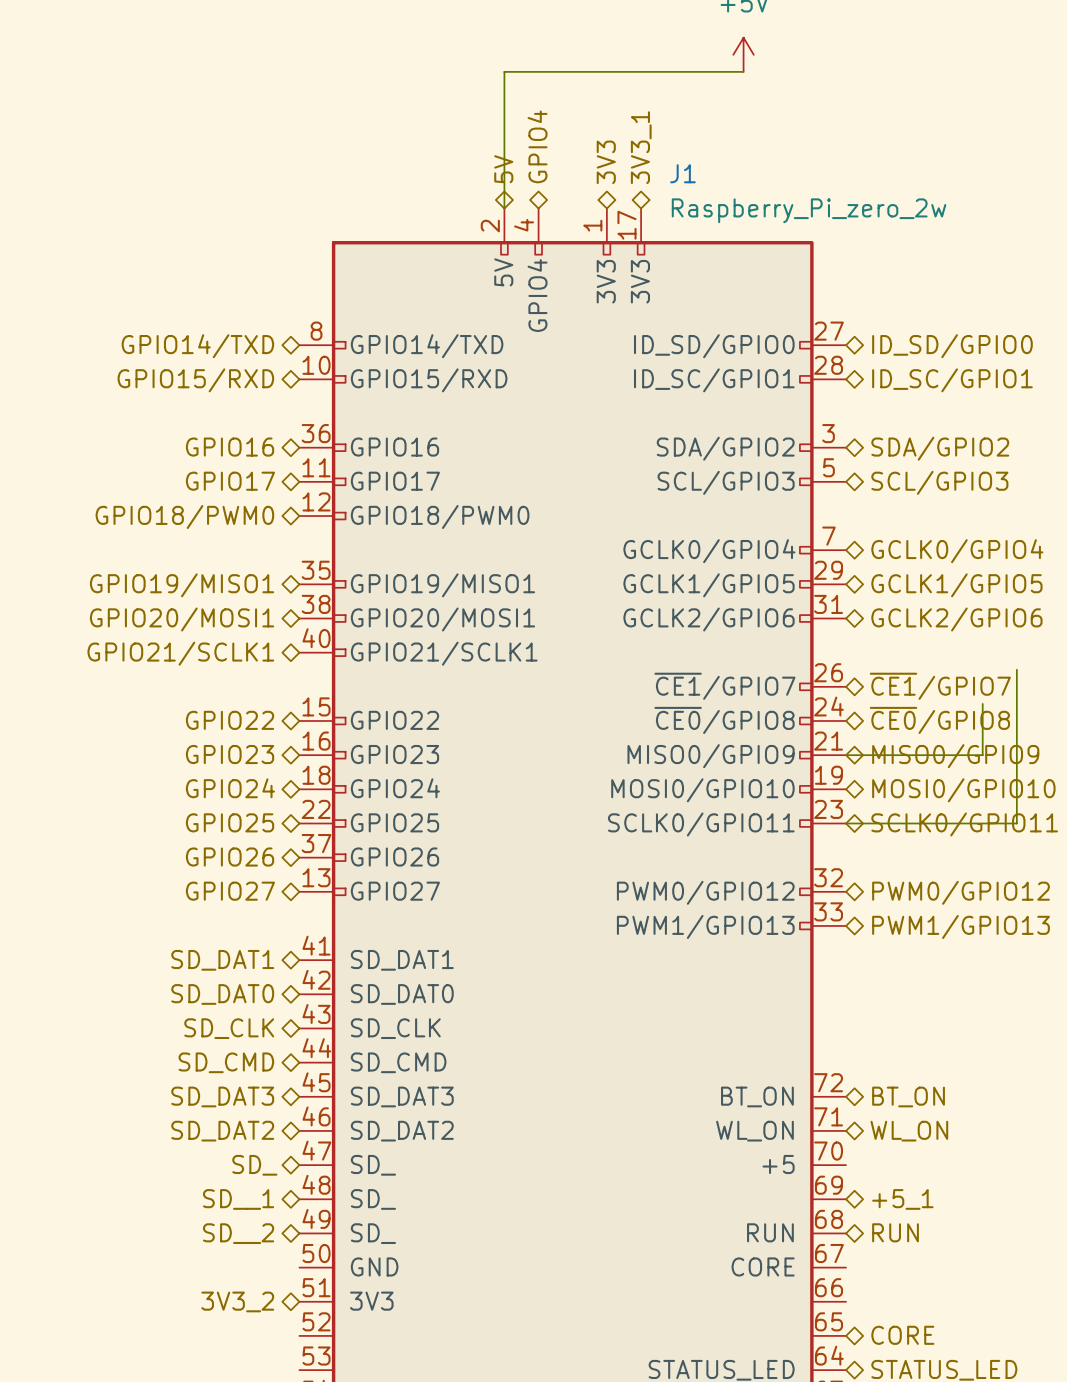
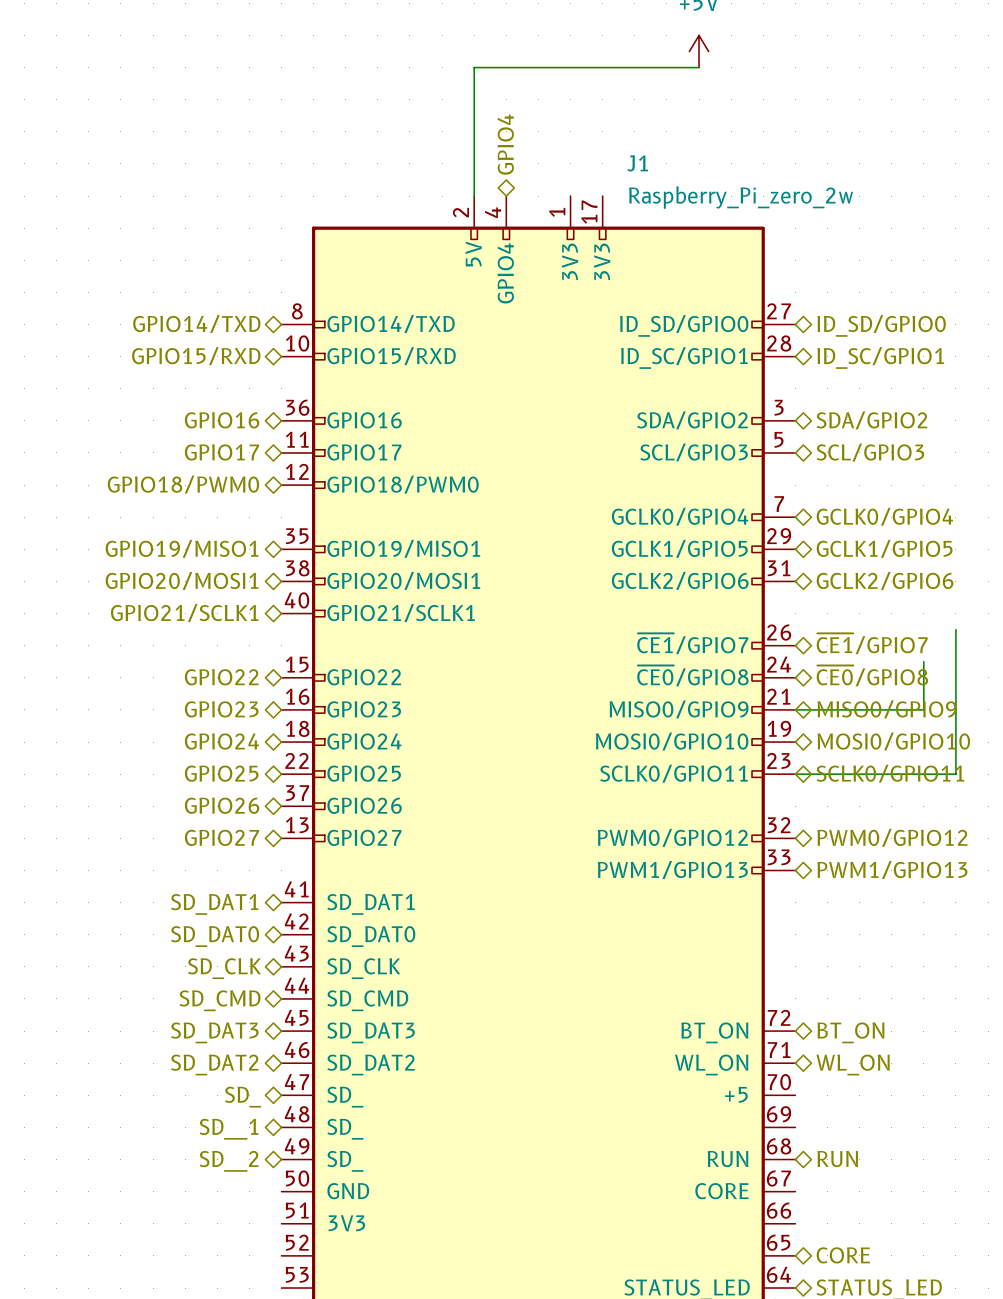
hierarchical label: 3V3_1 (641, 147) -> none
hierarchical label: 3V3 (606, 162) -> none
hierarchical label: 5V (503, 169) -> none
hierarchical label: +5_1 (902, 1199) -> none
hierarchical label: 3V3_2 (237, 1301) -> none

